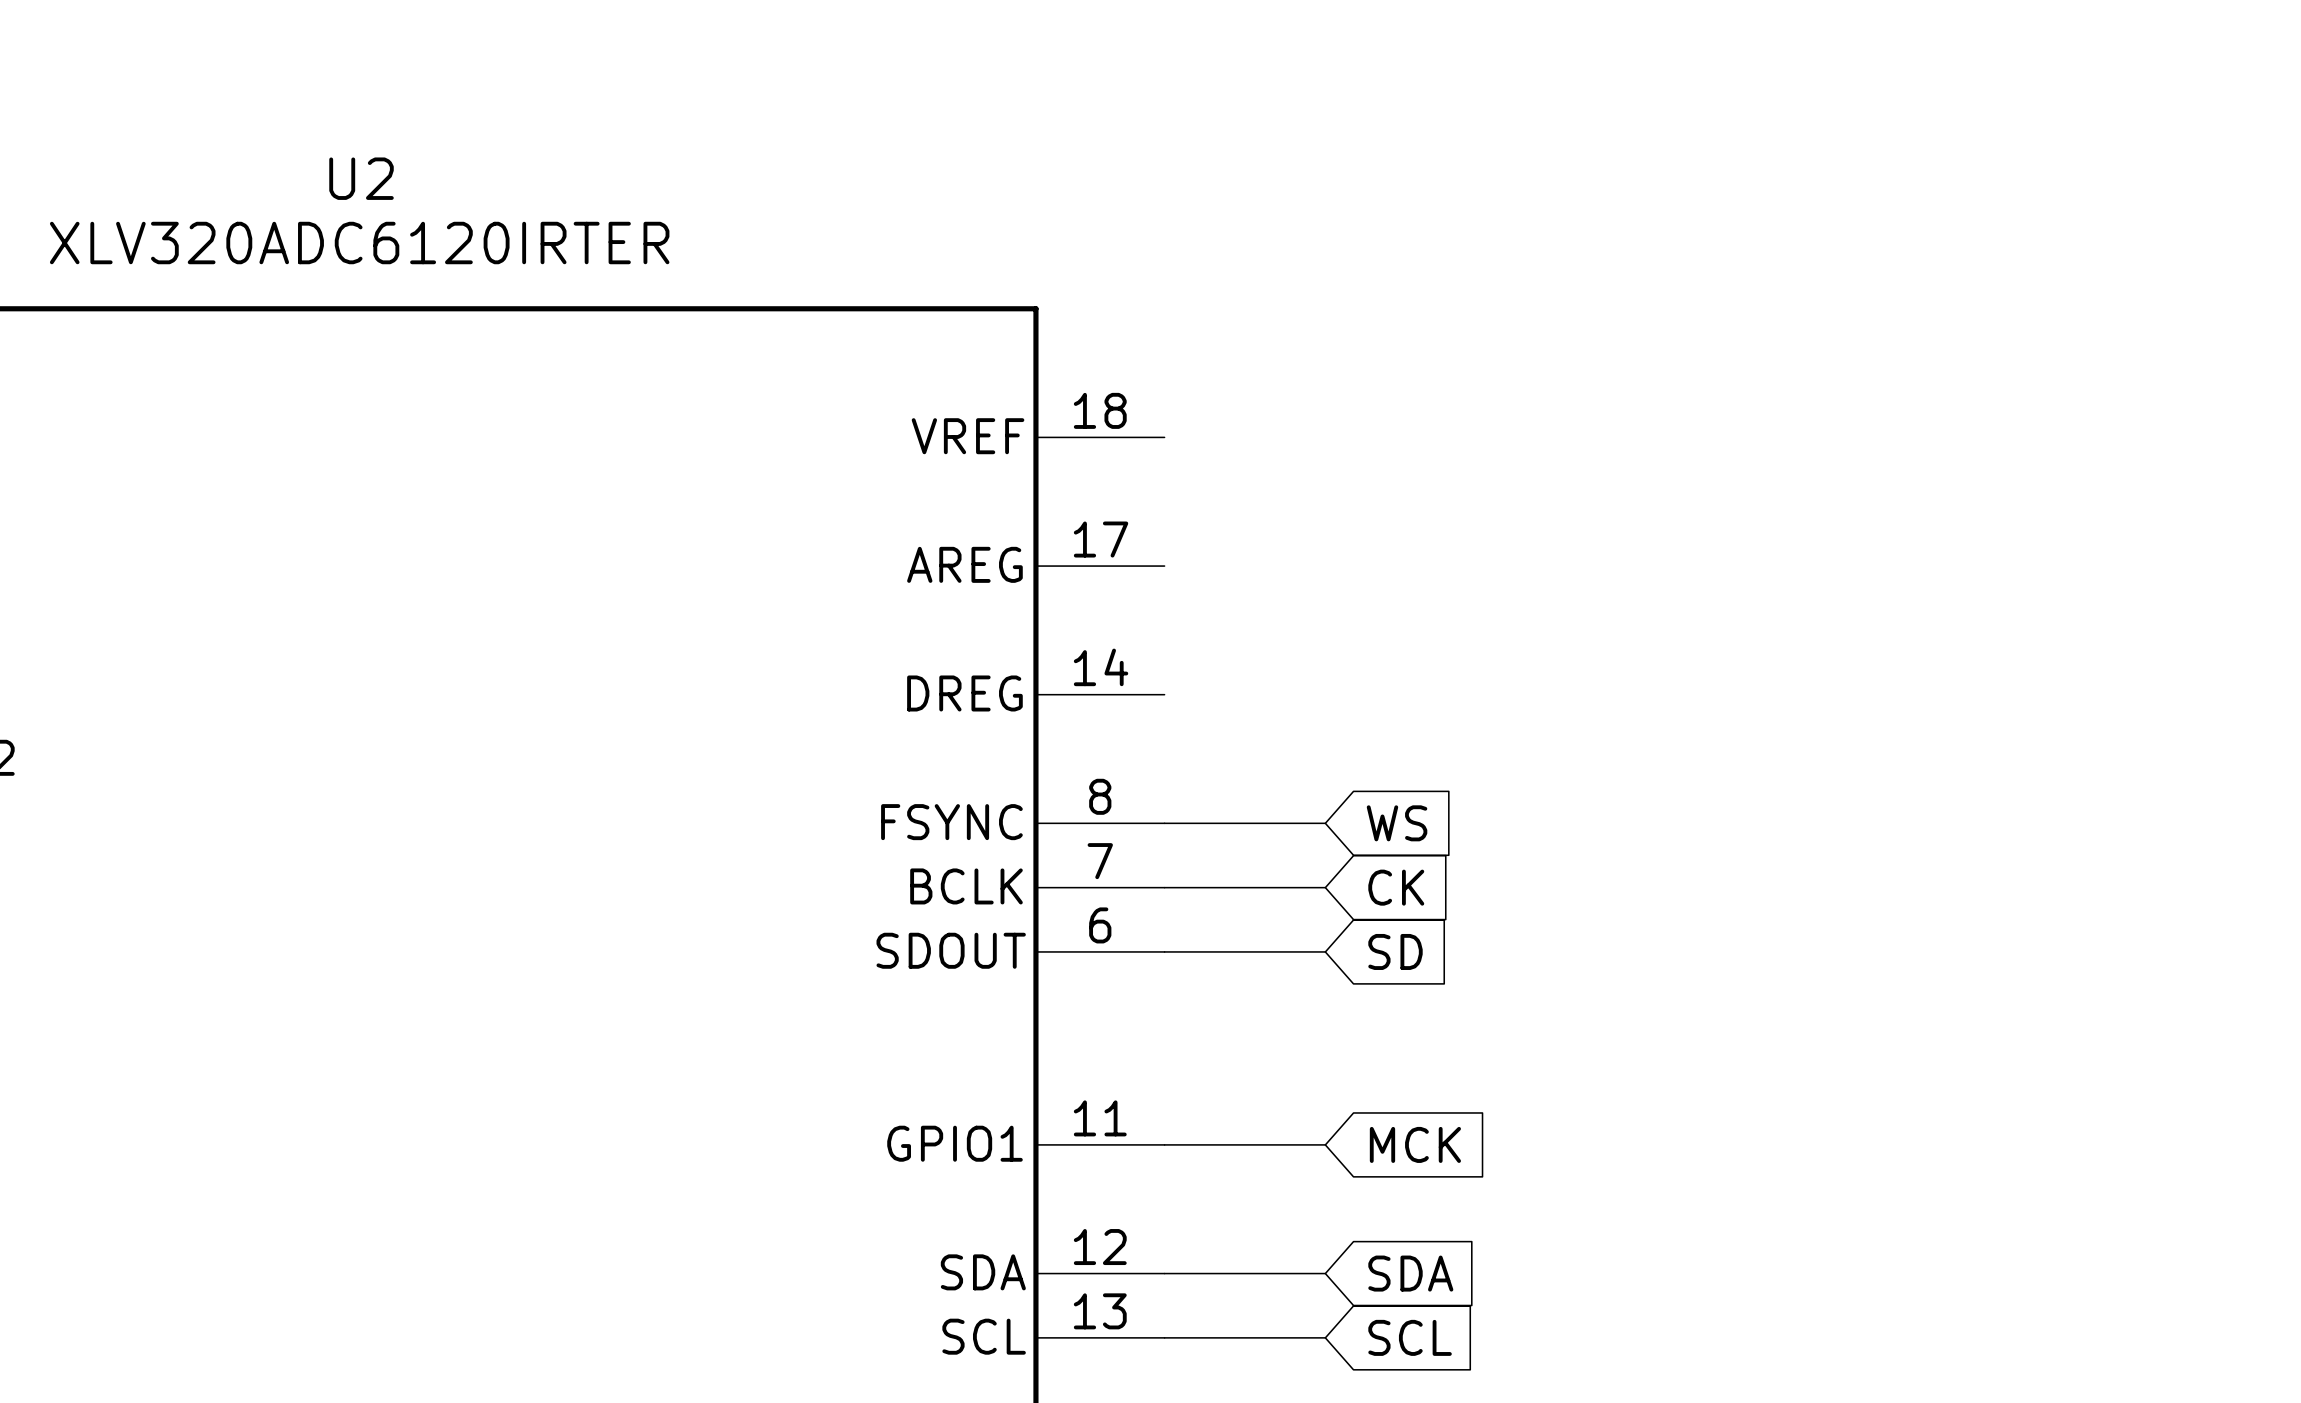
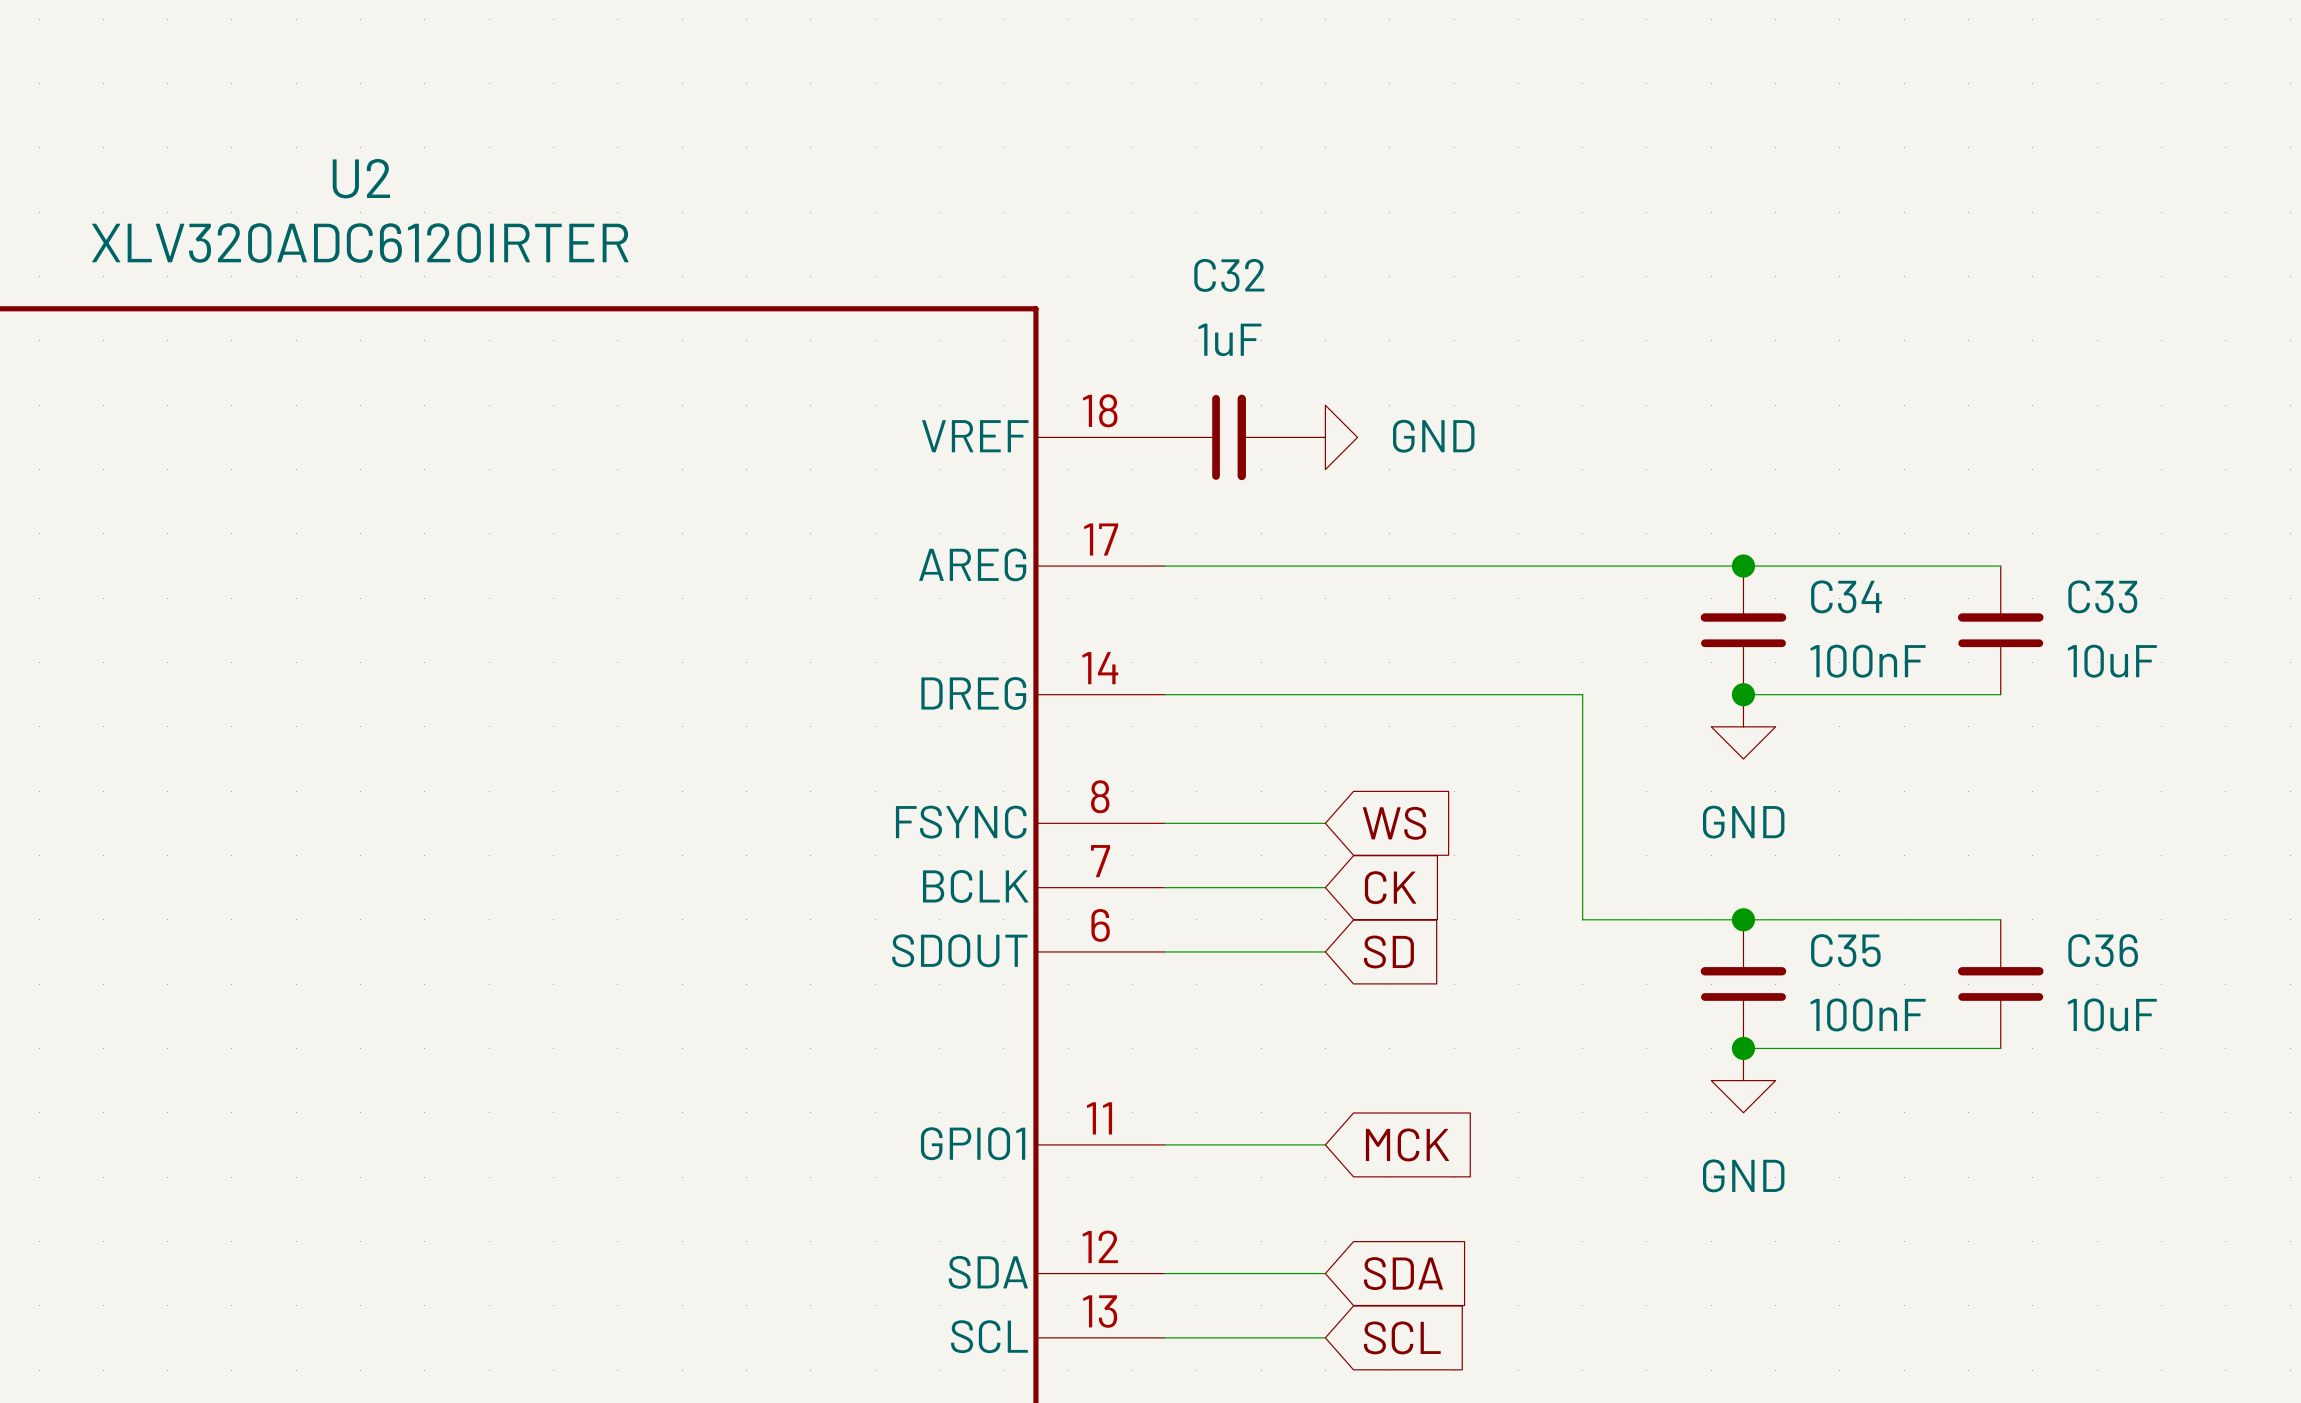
C32: none -> 1uF (1228, 437)
power symbol: none -> GND (1325, 437)
wire: none -> (1164, 566) (2000, 566)
junction: none -> (1743, 566)
C34: none -> 100nF (1743, 630)
C33: none -> 10uF (2000, 630)
wire: none -> (1164, 694) (1582, 694) (1582, 919) (2000, 919)
wire: none -> (1743, 694) (2000, 694)
junction: none -> (1743, 694)
power symbol: none -> GND (1743, 726)
junction: none -> (1743, 919)
C35: none -> 100nF (1743, 984)
C36: none -> 10uF (2000, 984)
wire: none -> (1743, 1048) (2000, 1048)
junction: none -> (1743, 1048)
power symbol: none -> GND (1743, 1080)

